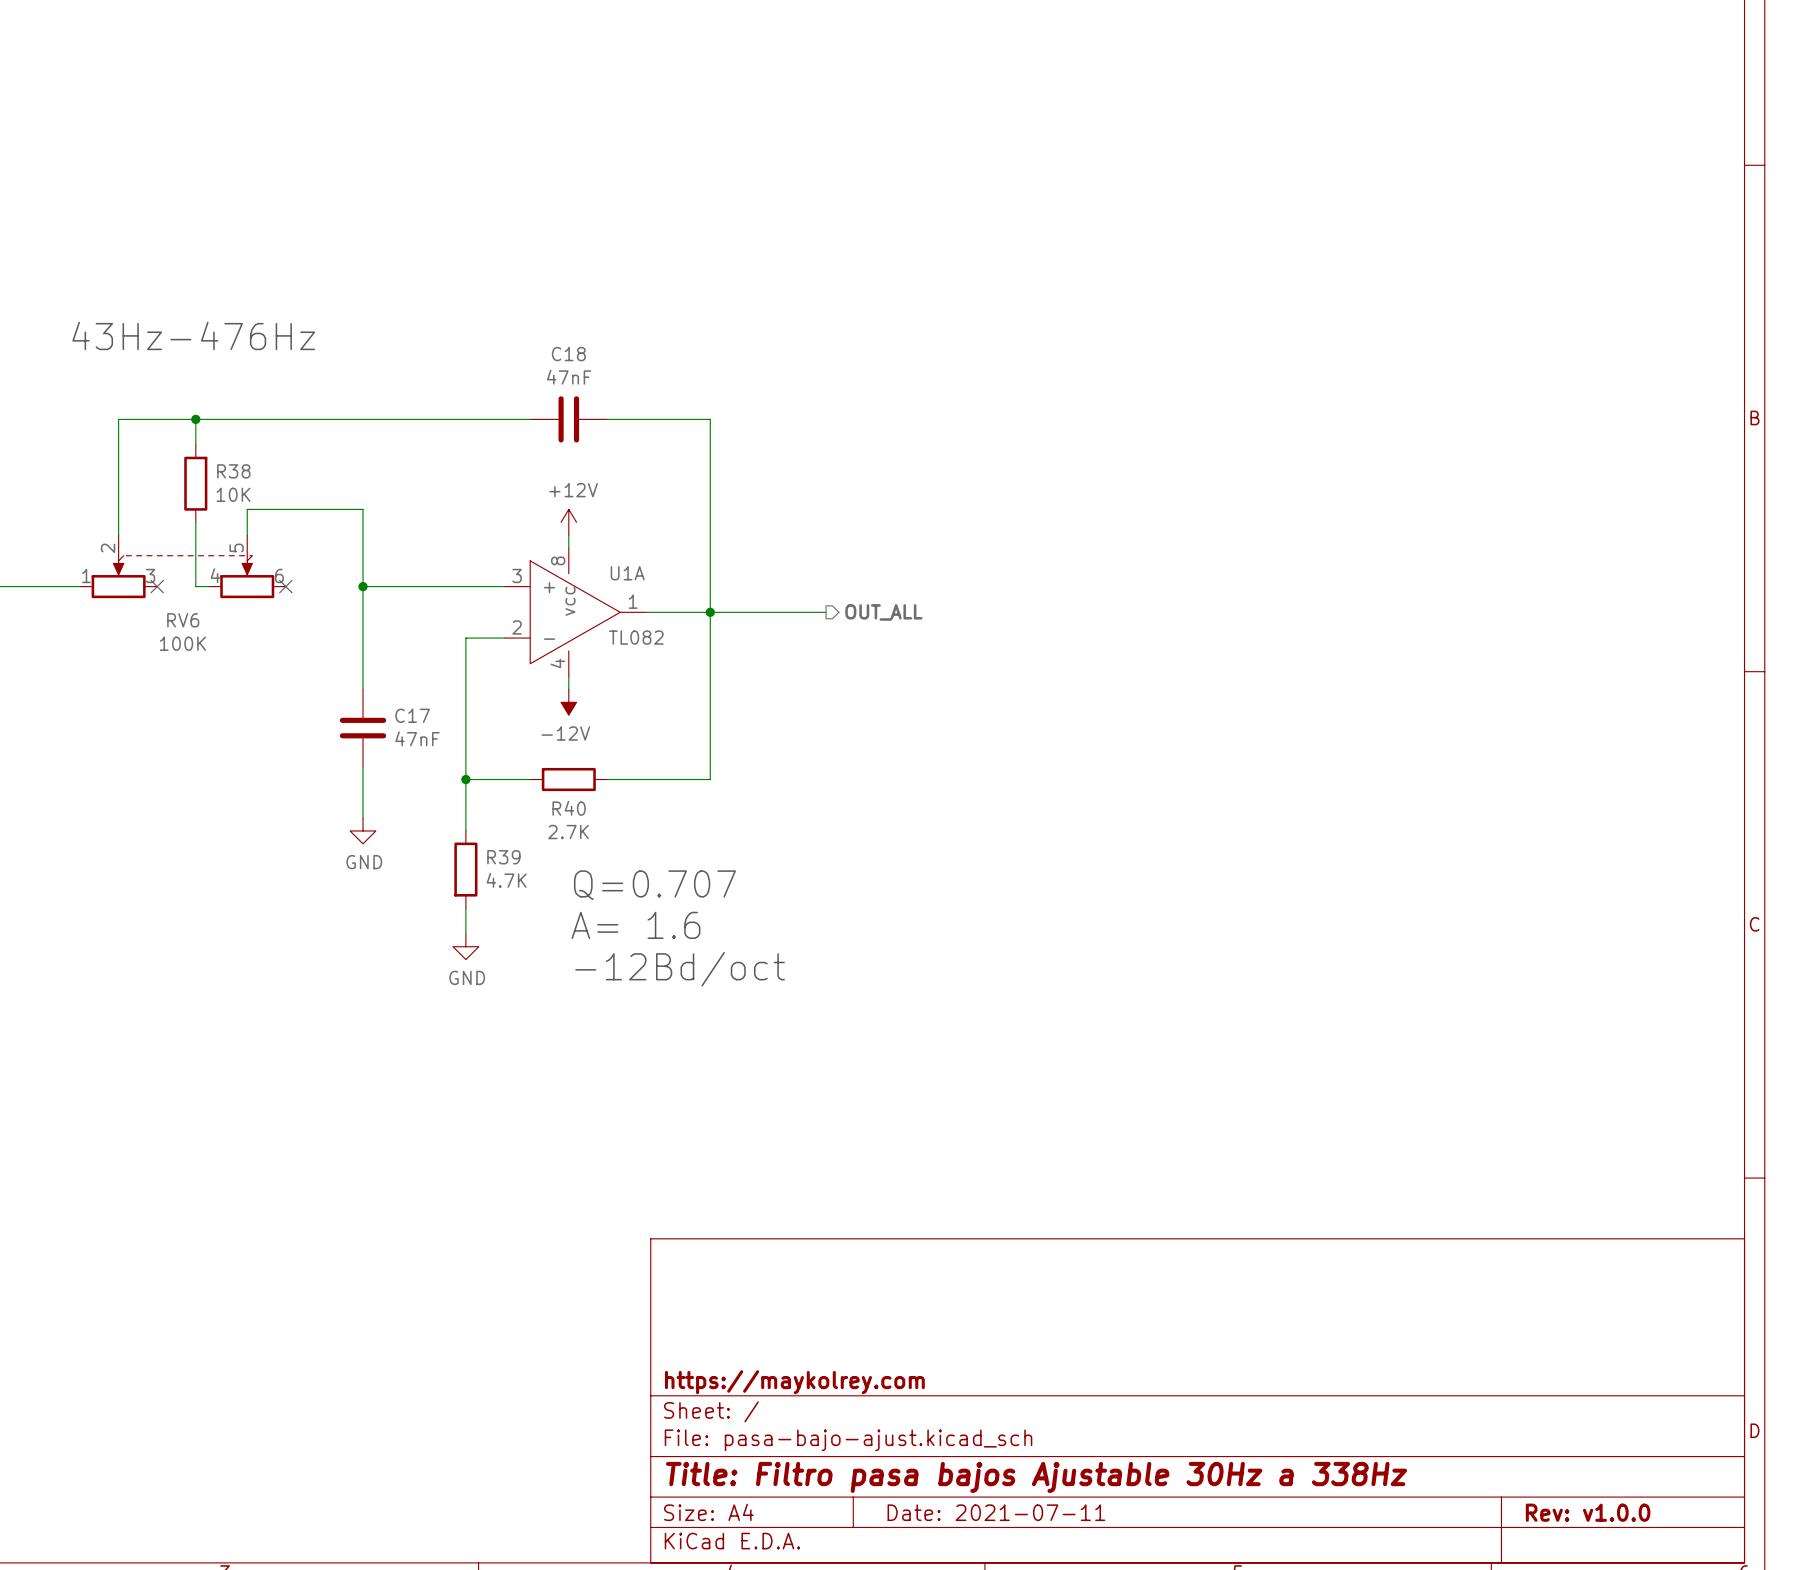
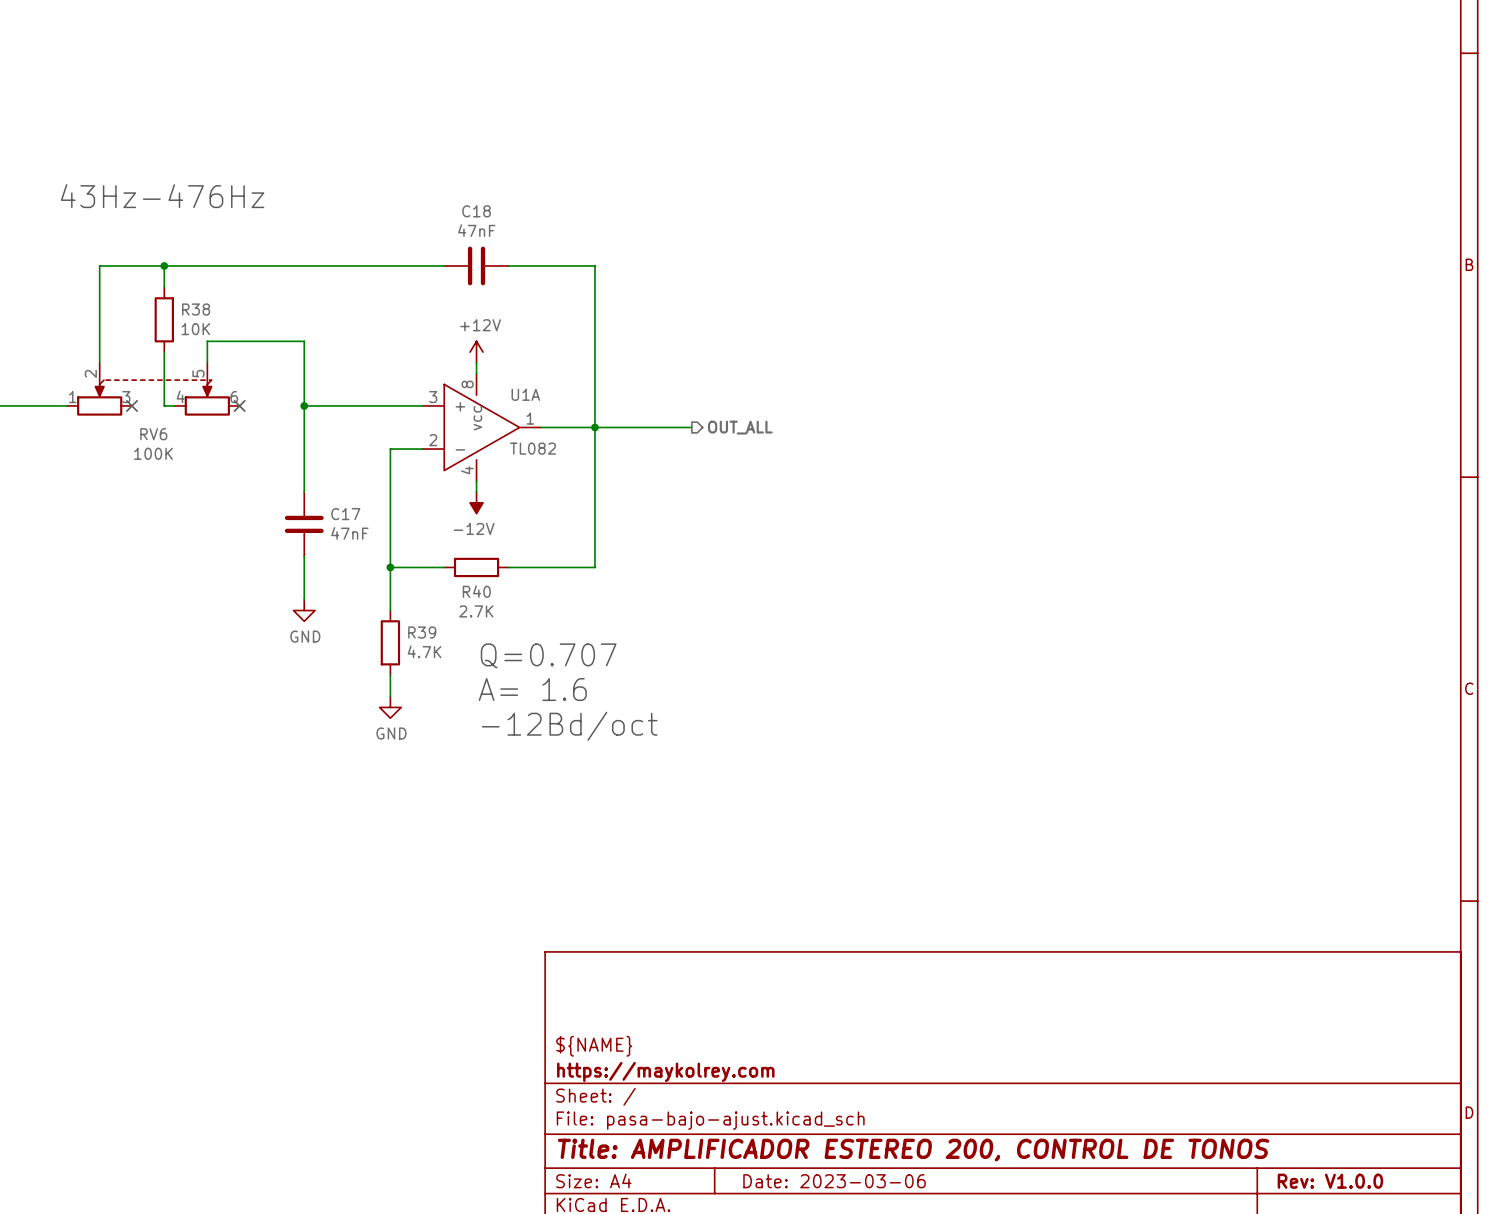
title block: none -> ${NAME} (594, 1046)
title block: Title: Filtro pasa bajos Ajustable 30Hz a 338Hz (1036, 1477) -> Title: AMPLIFICADOR ESTEREO 200, CONTROL DE TONOS (913, 1150)
title block: Date: 2021-07-11 (996, 1512) -> Date: 2023-03-06 (834, 1181)
title block: Rev: v1.0.0 (1588, 1512) -> Rev: V1.0.0 (1330, 1181)

